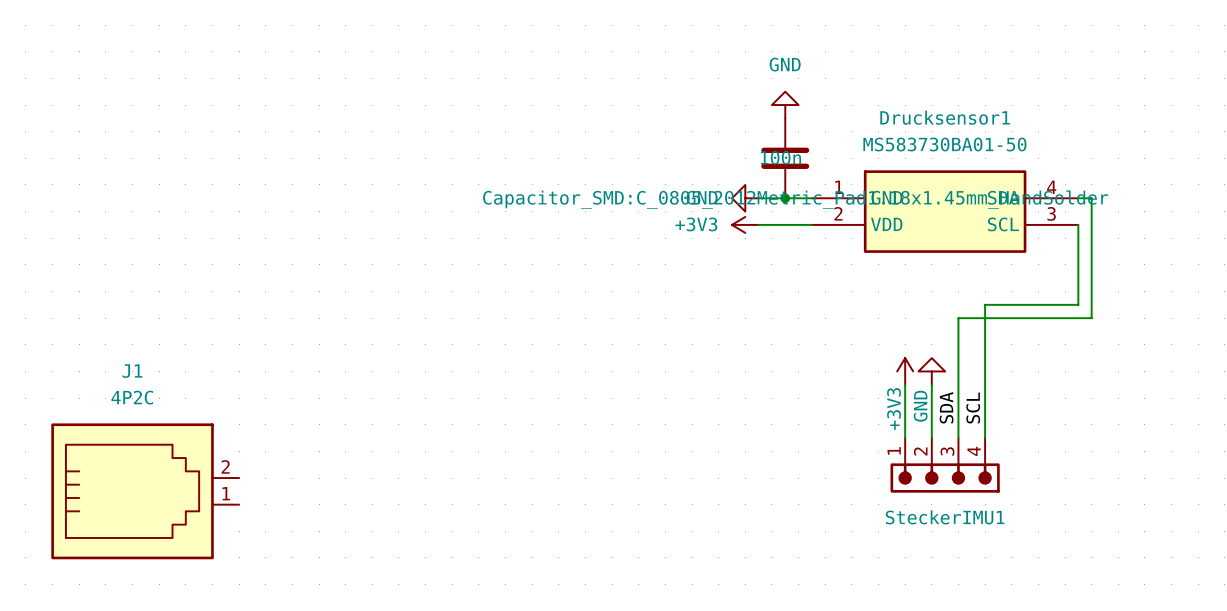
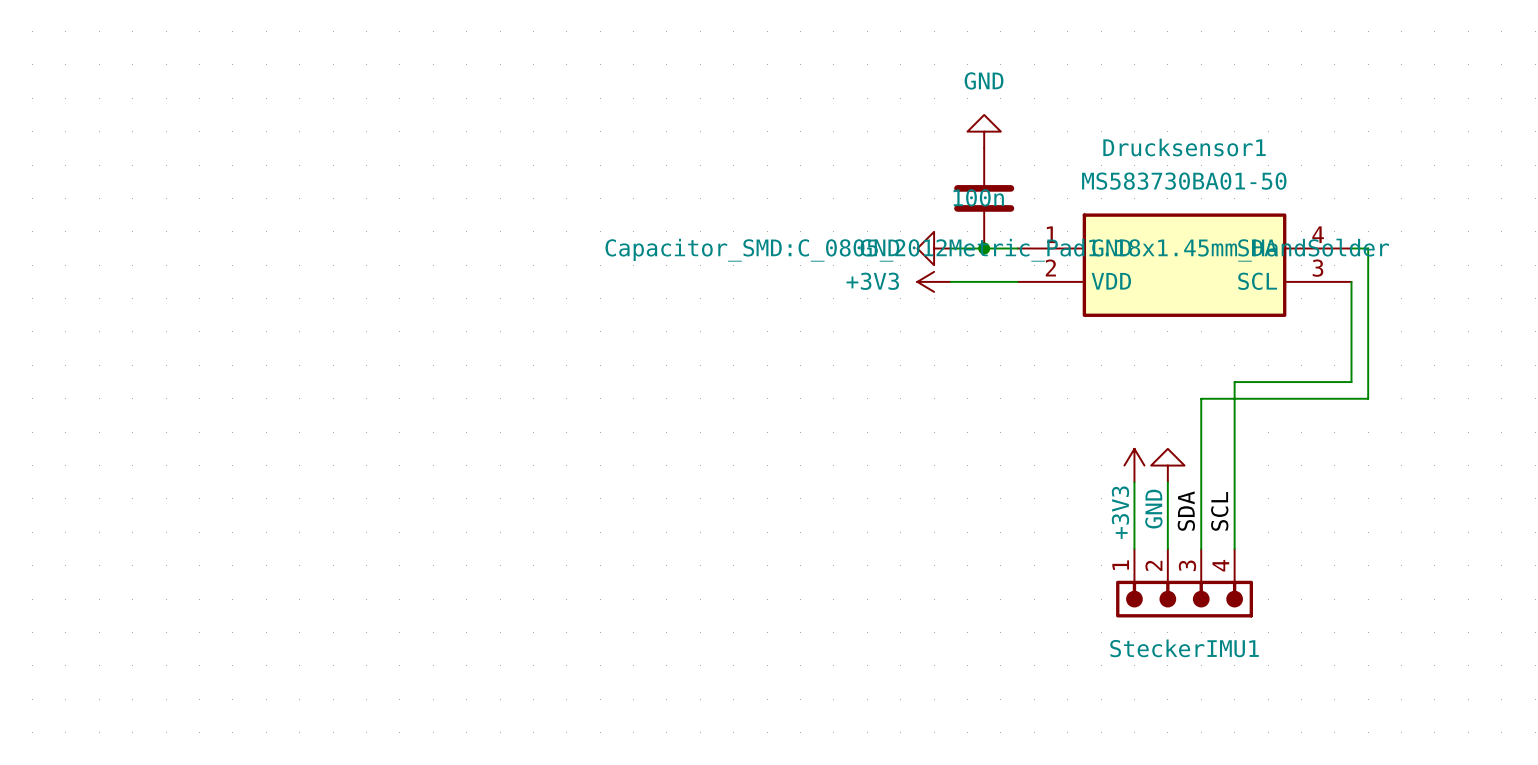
J1: 4P2C (145, 491) -> none

